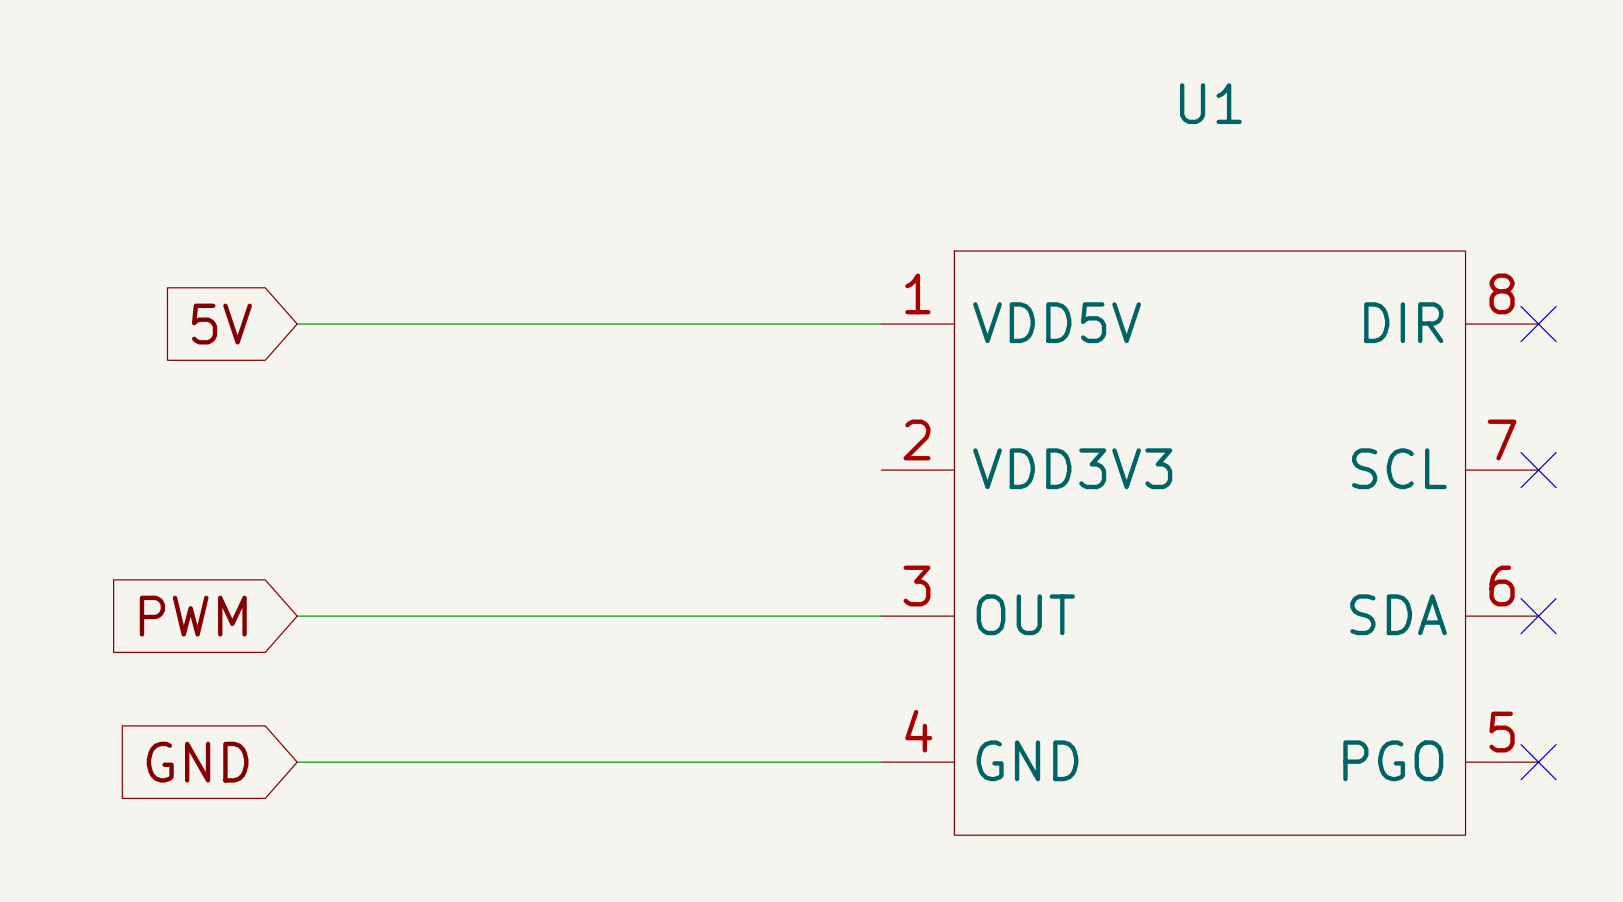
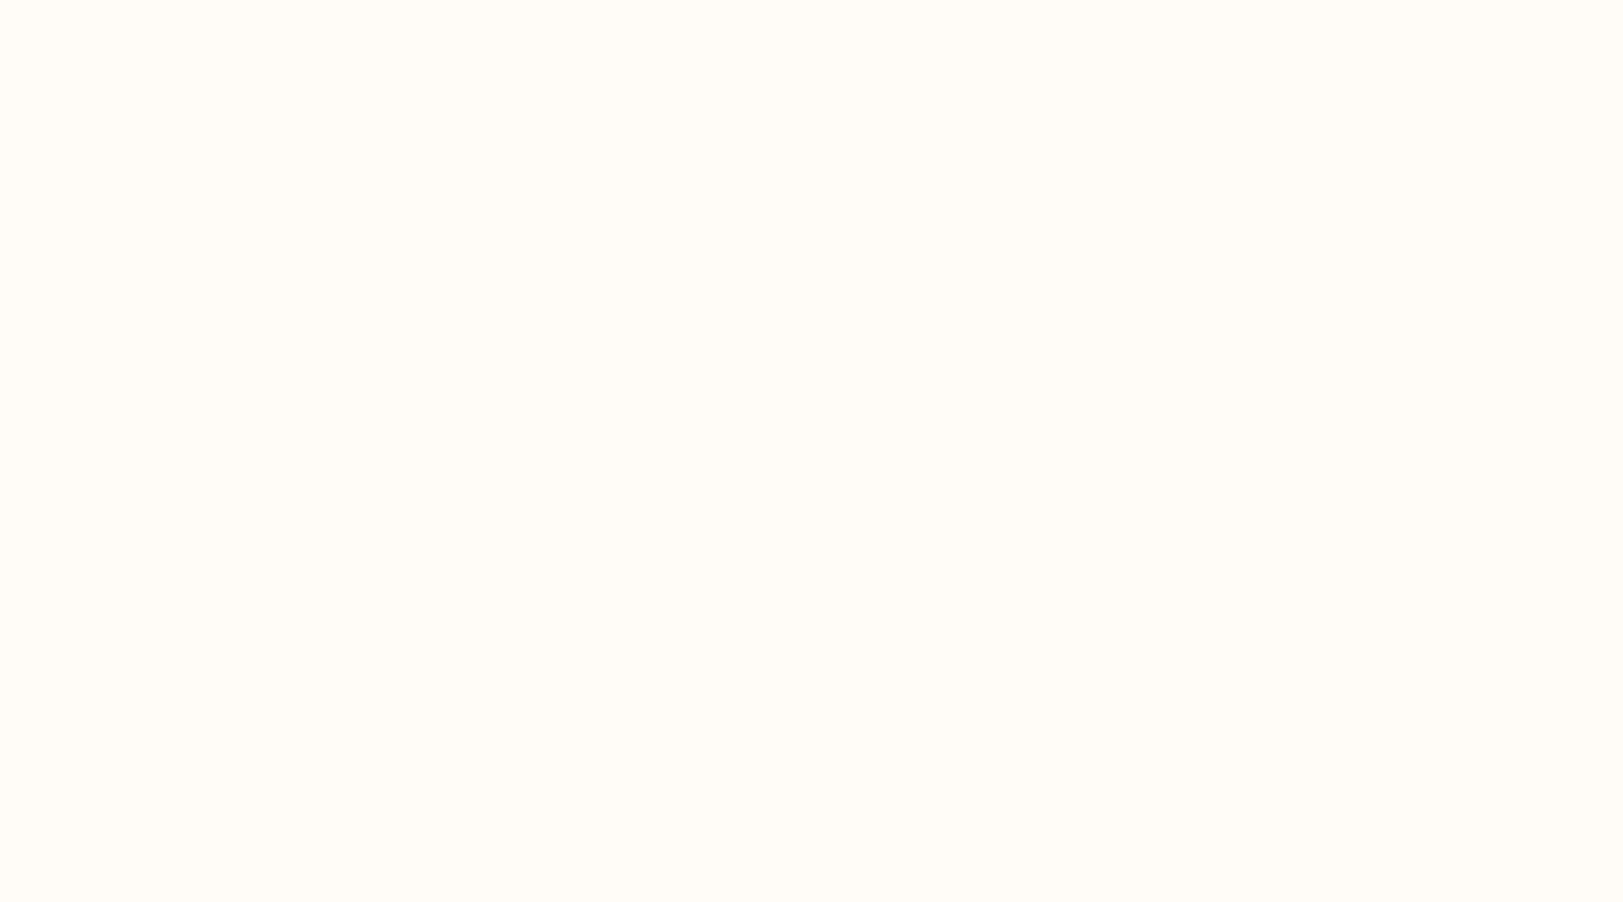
global label: 5V (221, 324) -> none
wire: (297, 324) (881, 324) -> none
no-connect mark: (1538, 324) -> none
no-connect mark: (1538, 470) -> none
U1: (1209, 543) -> none
global label: PWM (193, 616) -> none
wire: (297, 616) (881, 616) -> none
no-connect mark: (1538, 616) -> none
global label: GND (197, 762) -> none
wire: (297, 762) (881, 762) -> none
no-connect mark: (1538, 762) -> none

